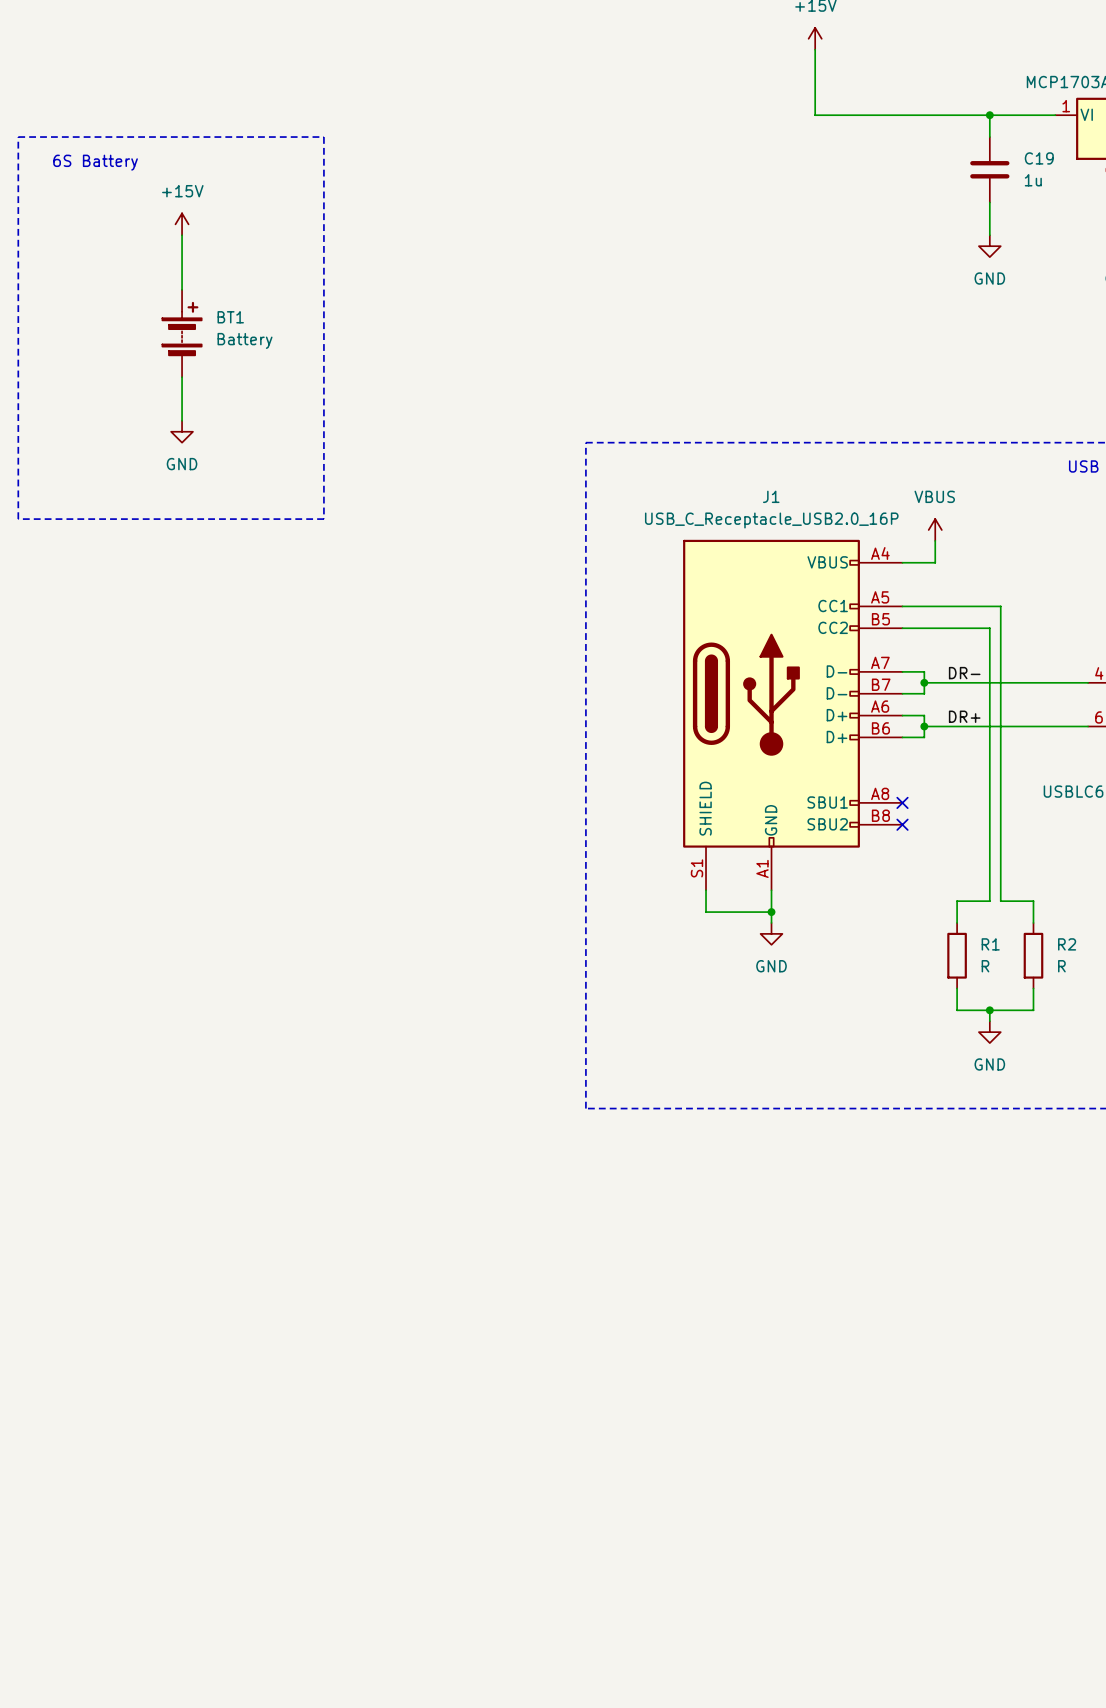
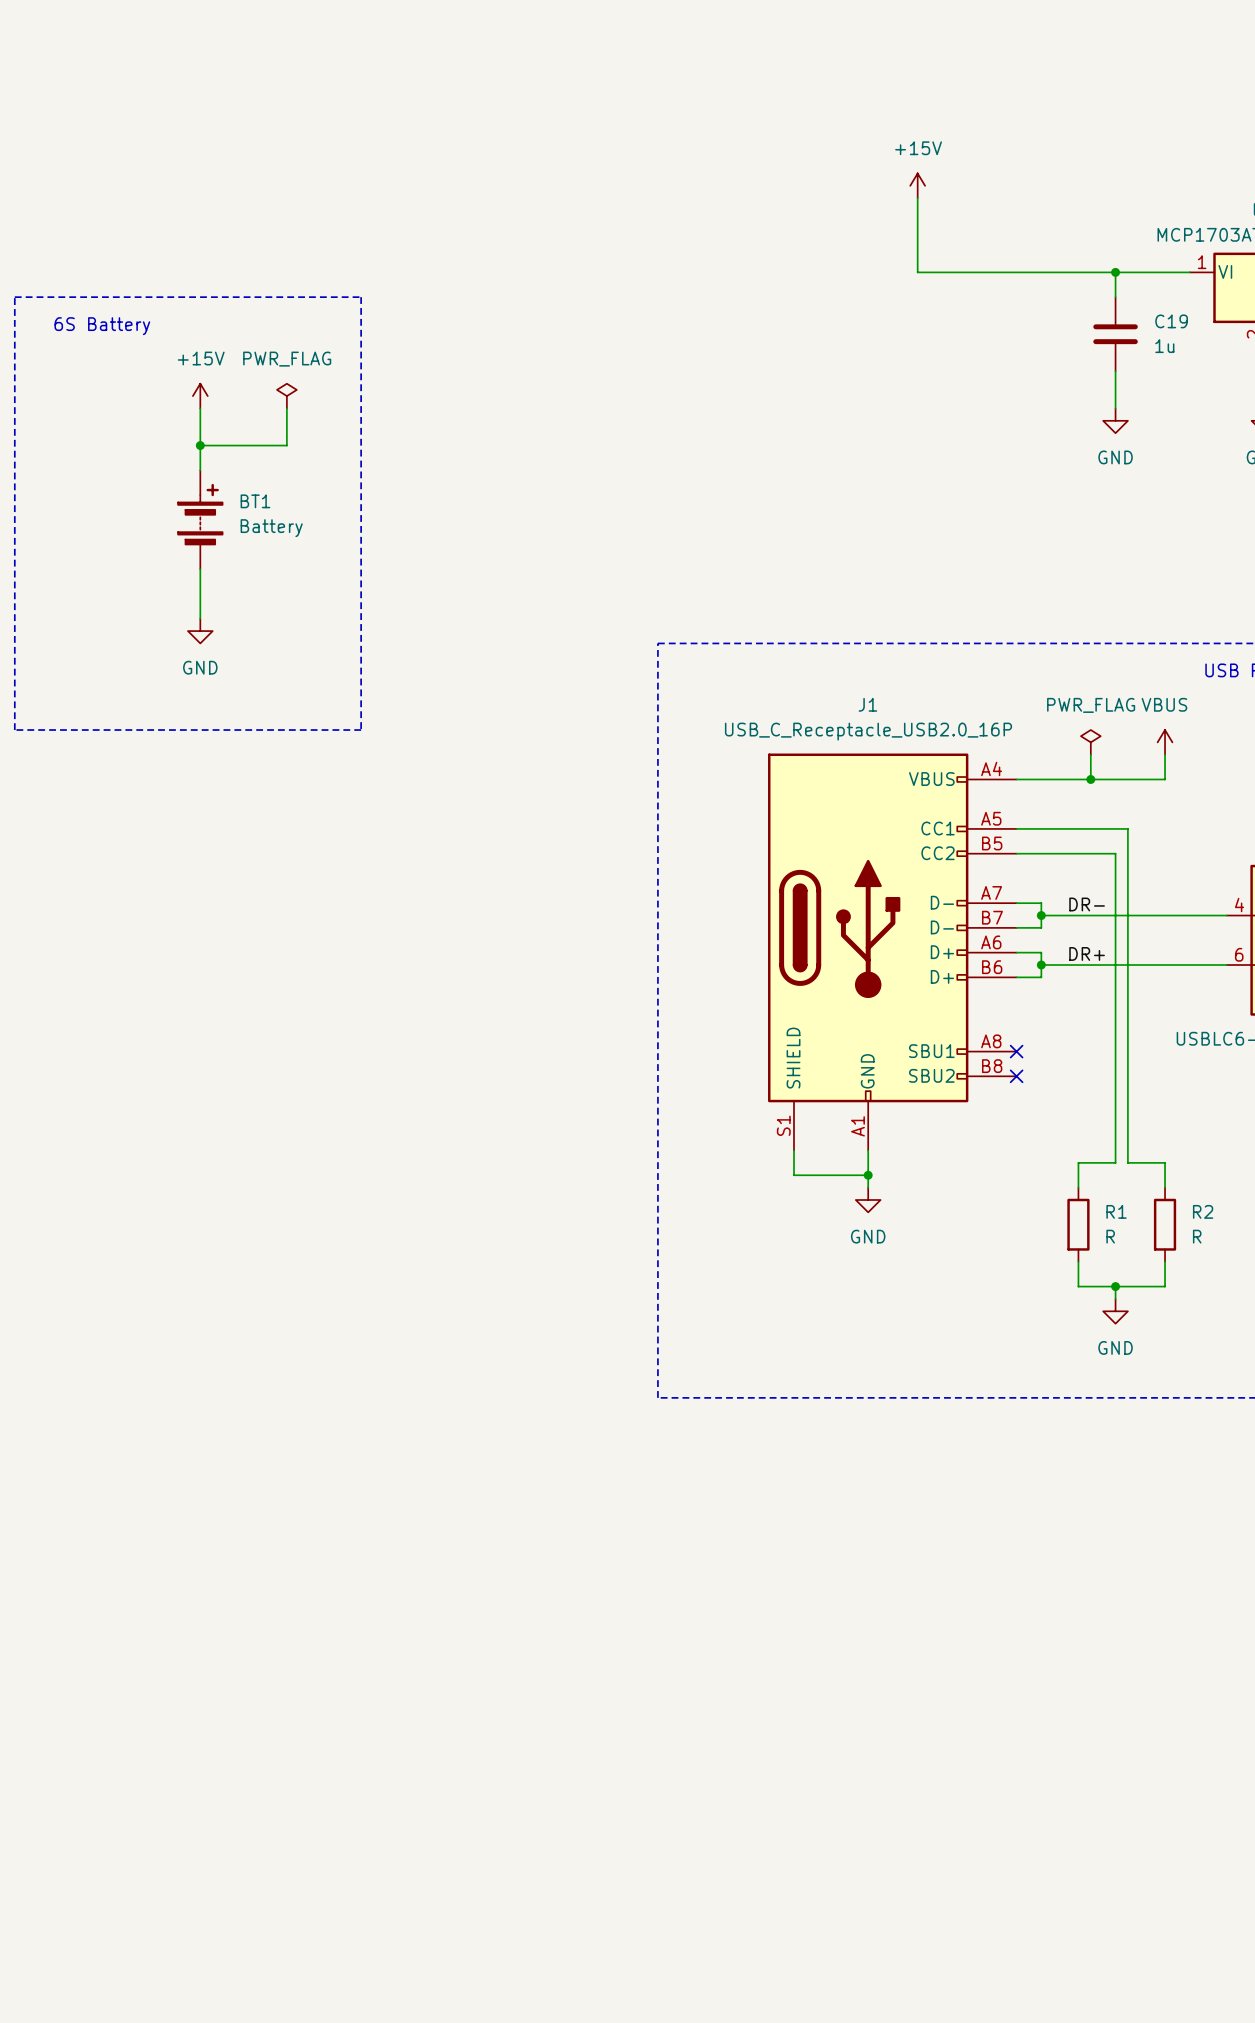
power symbol: none -> PWR_FLAG (286, 396)
wire: none -> (286, 408) (286, 445) (200, 445)
junction: none -> (200, 445)
power symbol position: VBUS (935, 530) -> VBUS (1165, 742)
power symbol: none -> PWR_FLAG (1090, 742)
wire: (935, 540) (935, 562) -> (1165, 754) (1165, 779) (1053, 779)
wire: none -> (1090, 754) (1090, 779)
junction: none -> (1090, 779)

